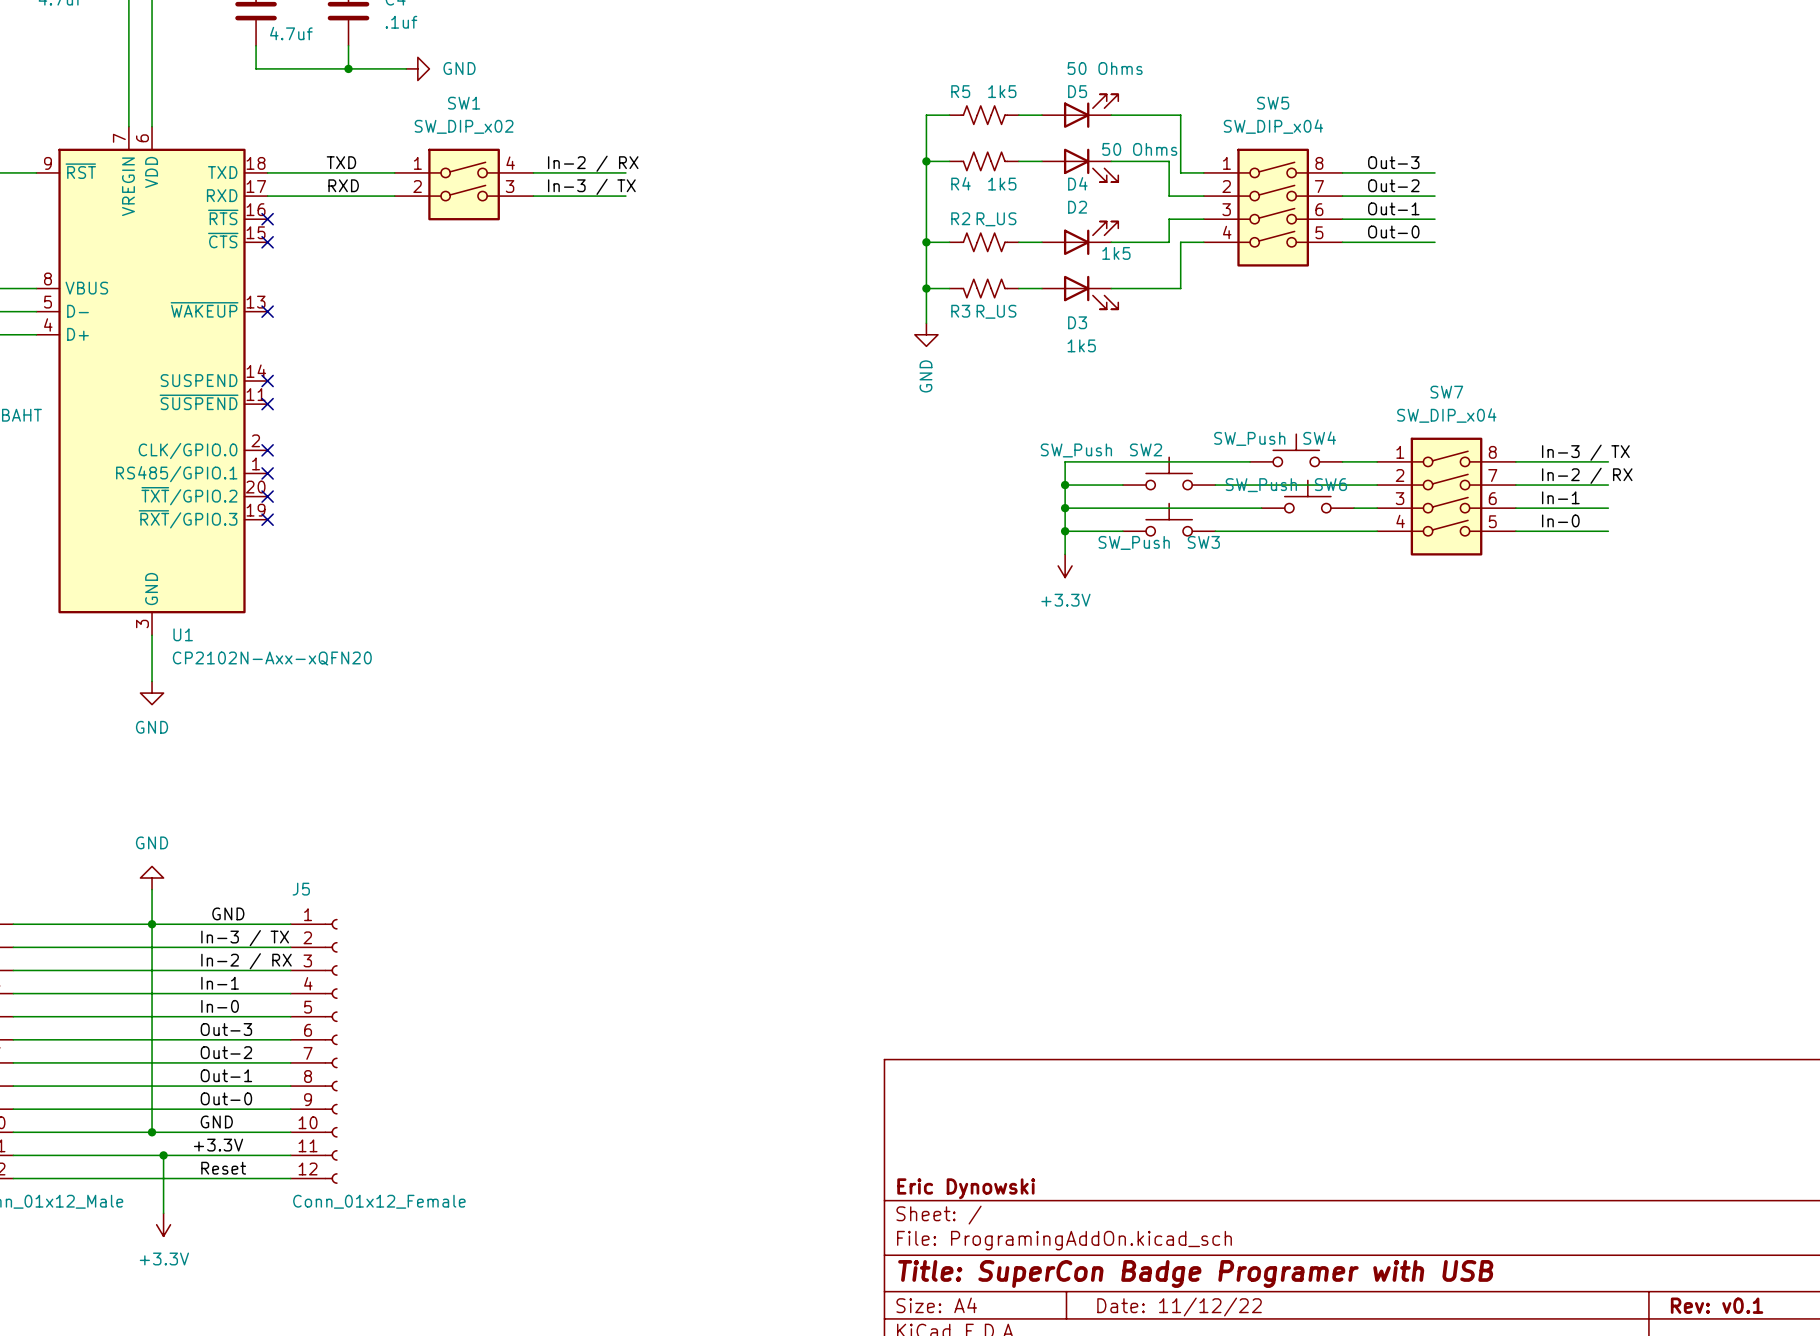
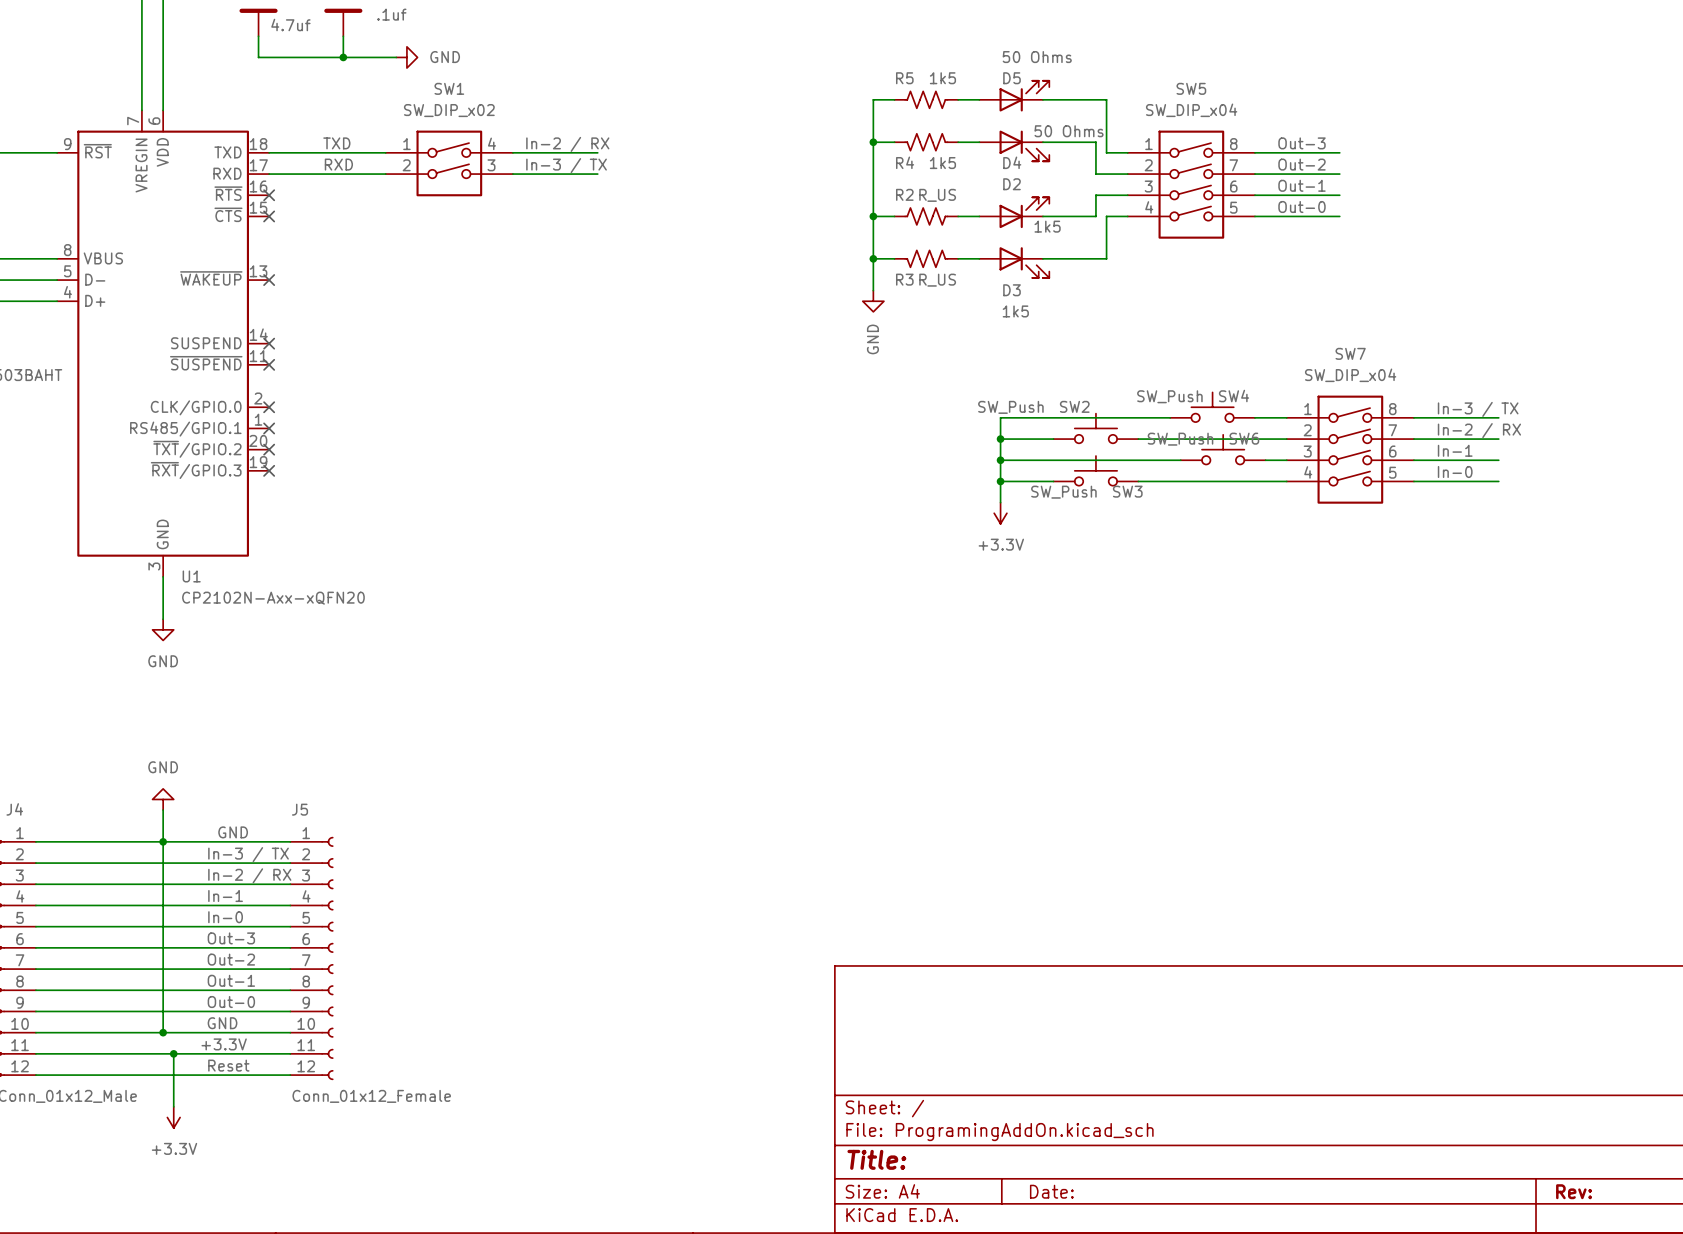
title block: Eric Dynowski (966, 1188) -> none
title block: Title: SuperCon Badge Programer with USB (1195, 1273) -> Title: (876, 1159)
title block: Rev: v0.1 (1717, 1305) -> Rev: (1574, 1191)
title block: Date: 11/12/22 (1179, 1307) -> Date: (1051, 1191)

